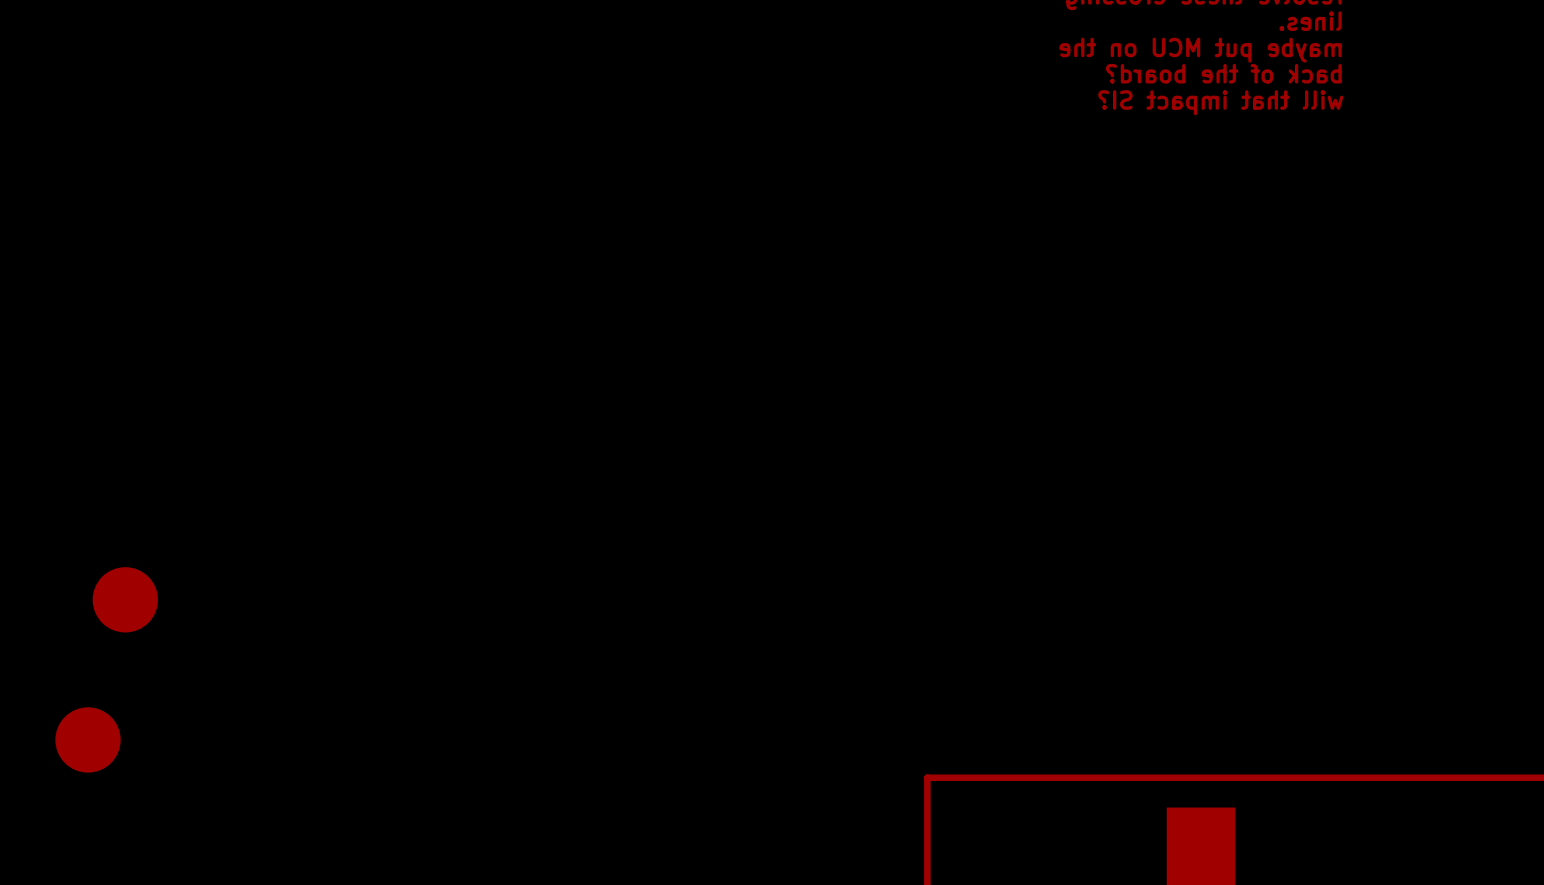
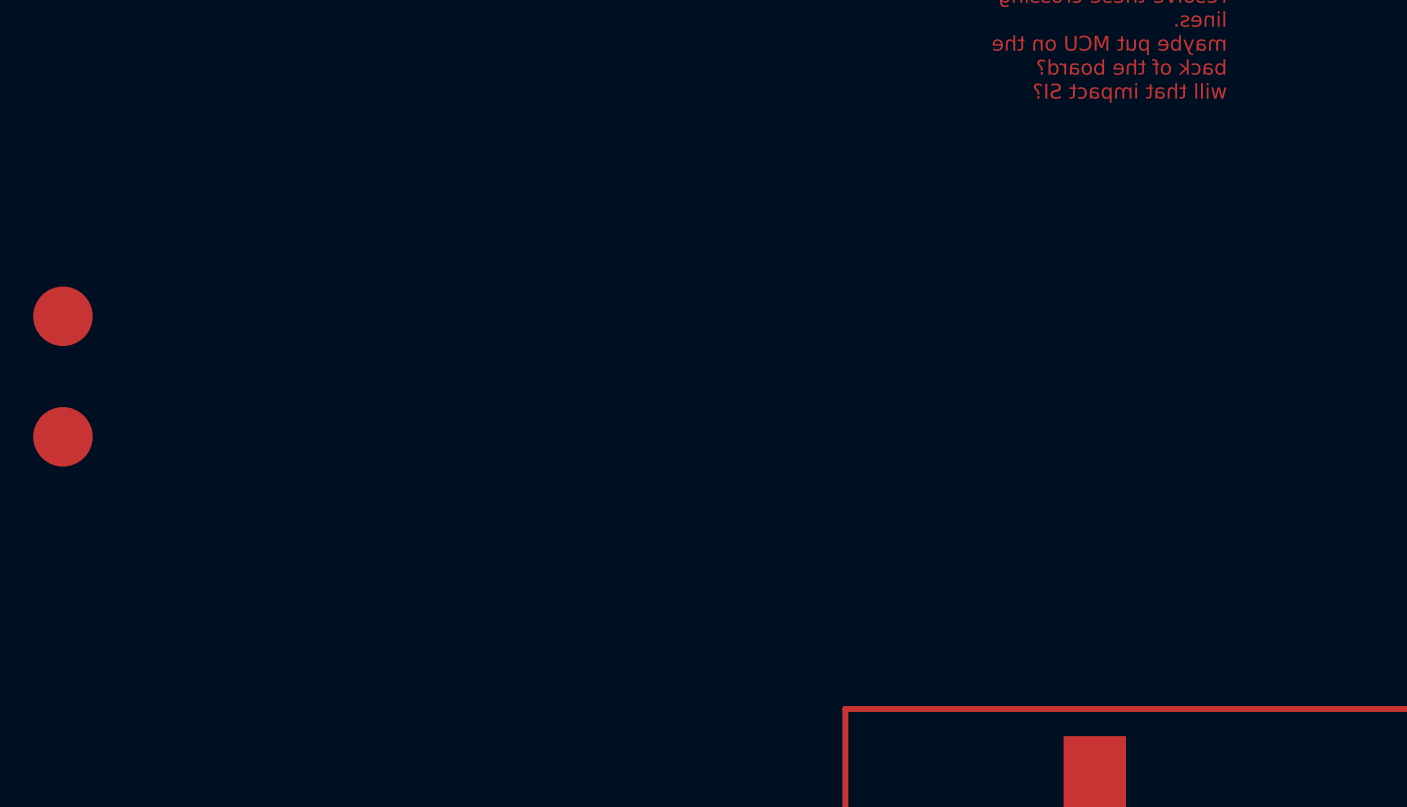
part: none -> (62, 316)
part: none -> (62, 436)
part: (125, 599) -> none
part: (88, 739) -> none

